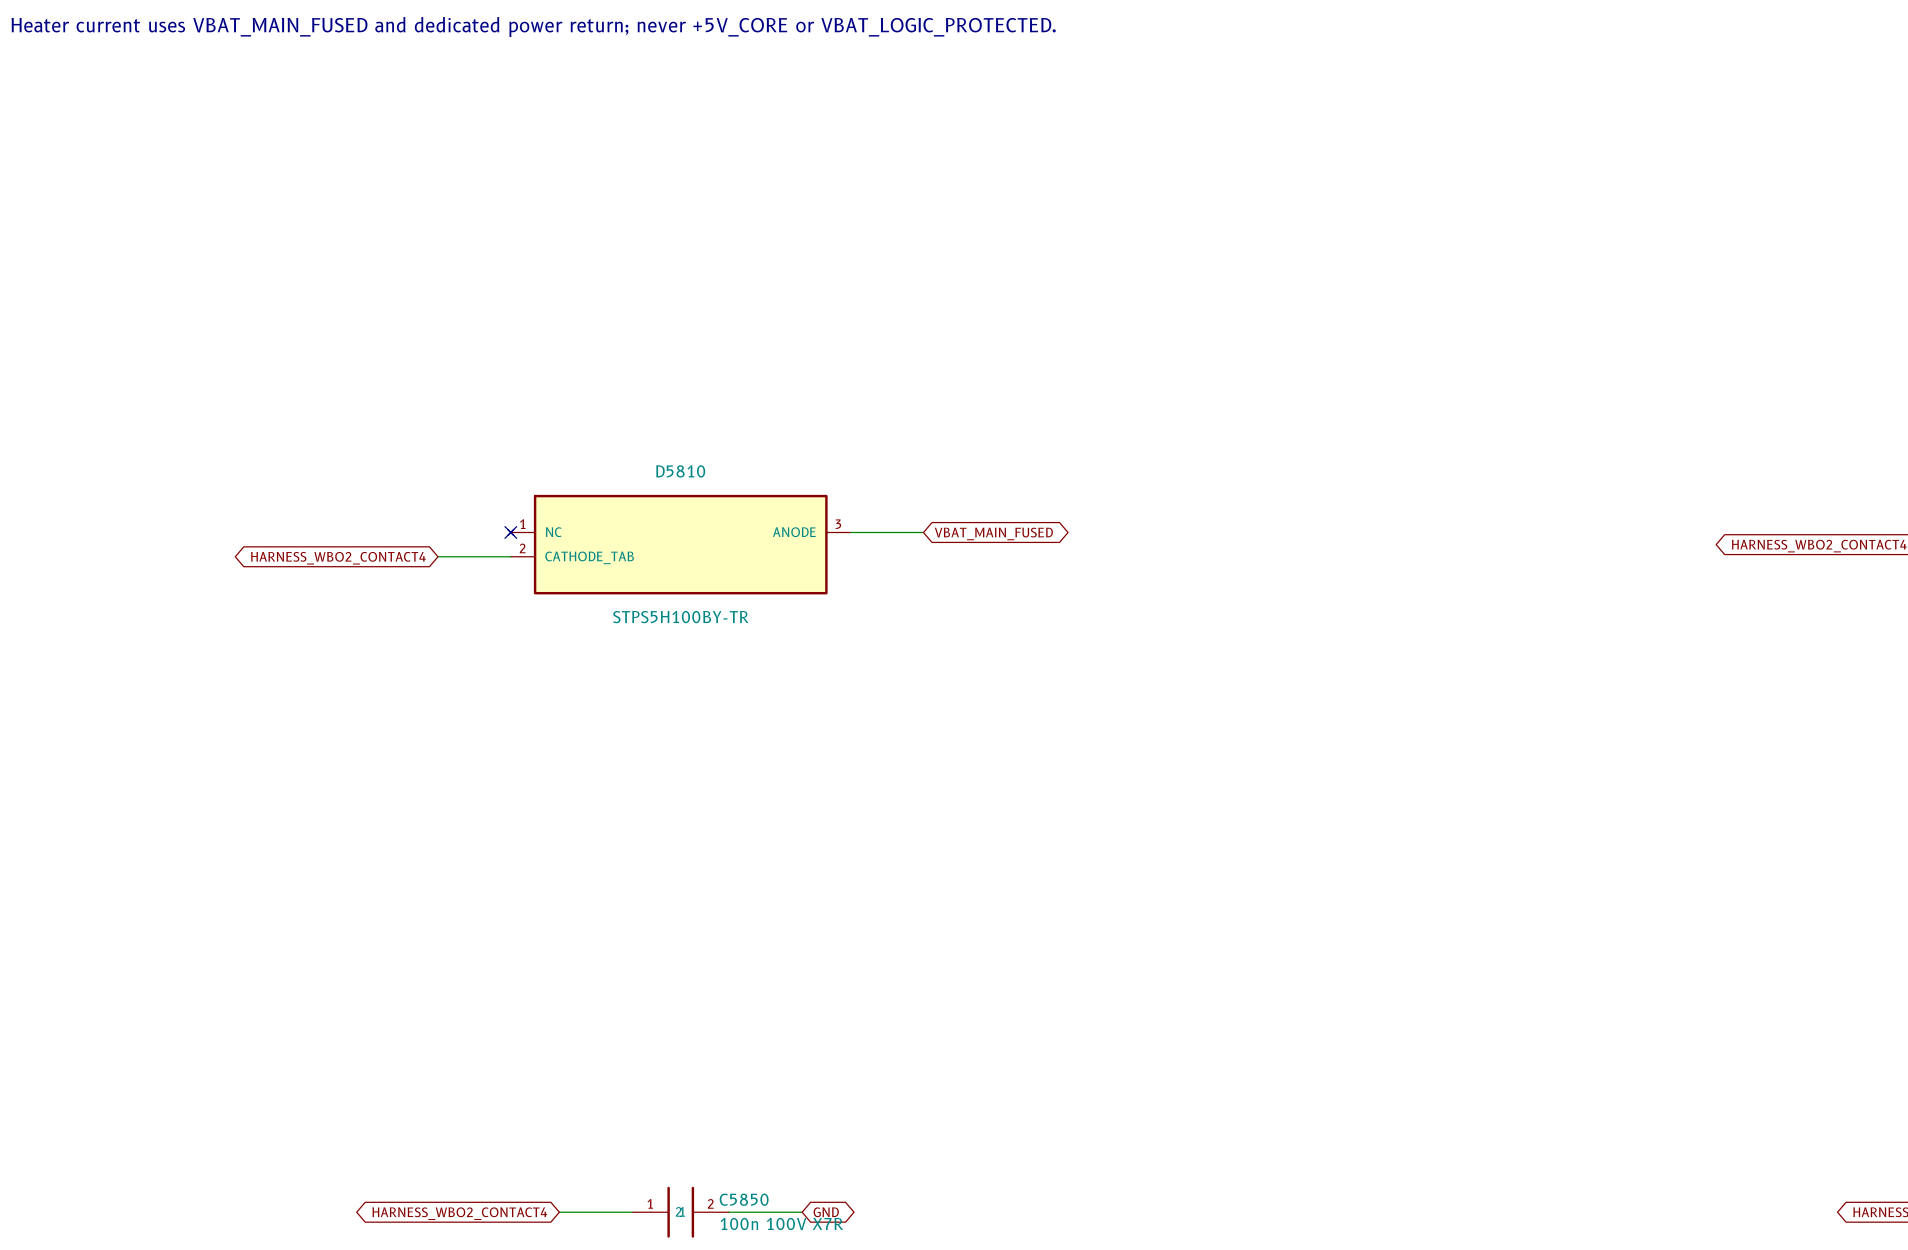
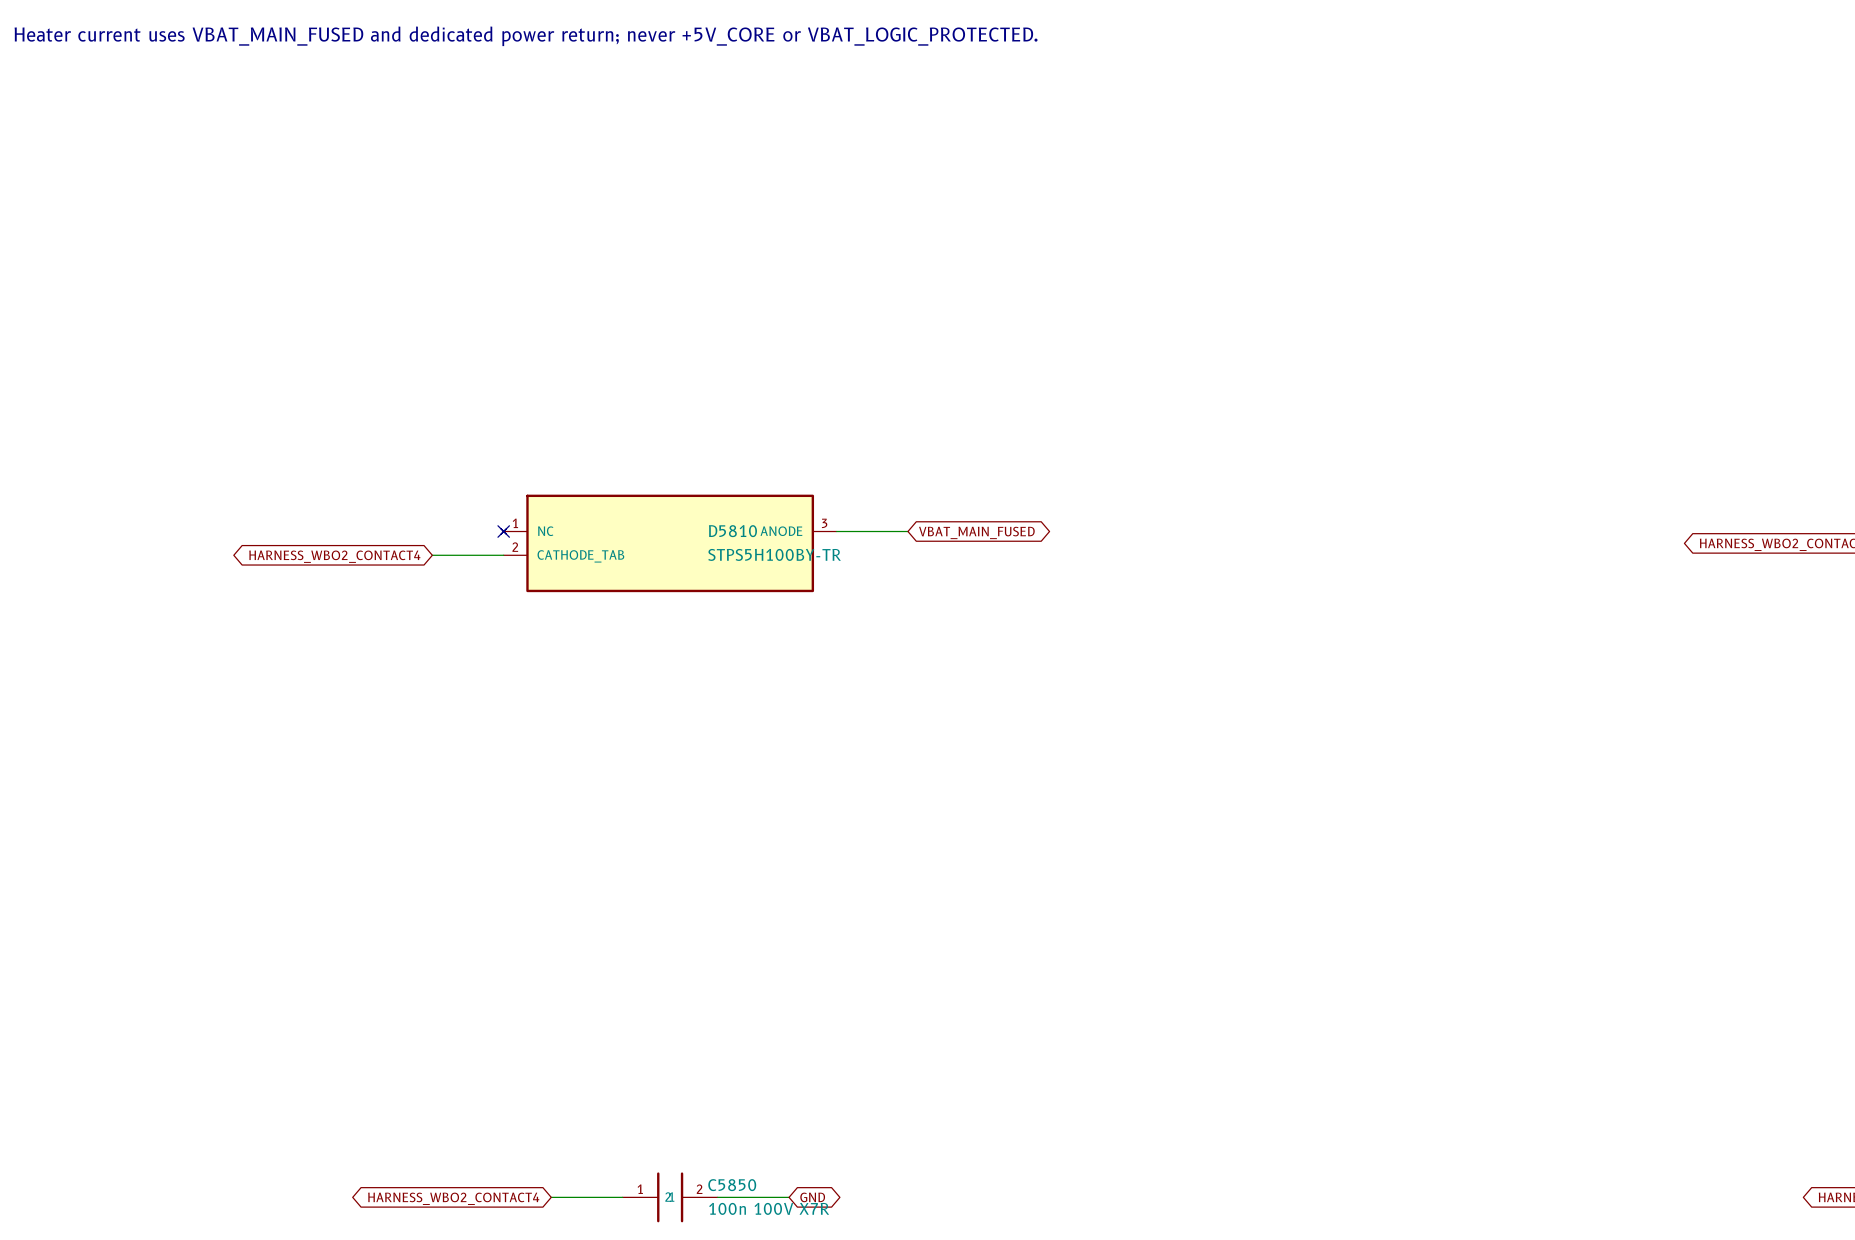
D5810 name position: D5810 (680, 471) -> D5810 (732, 531)
D5810 value position: STPS5H100BY-TR (680, 617) -> STPS5H100BY-TR (774, 554)

